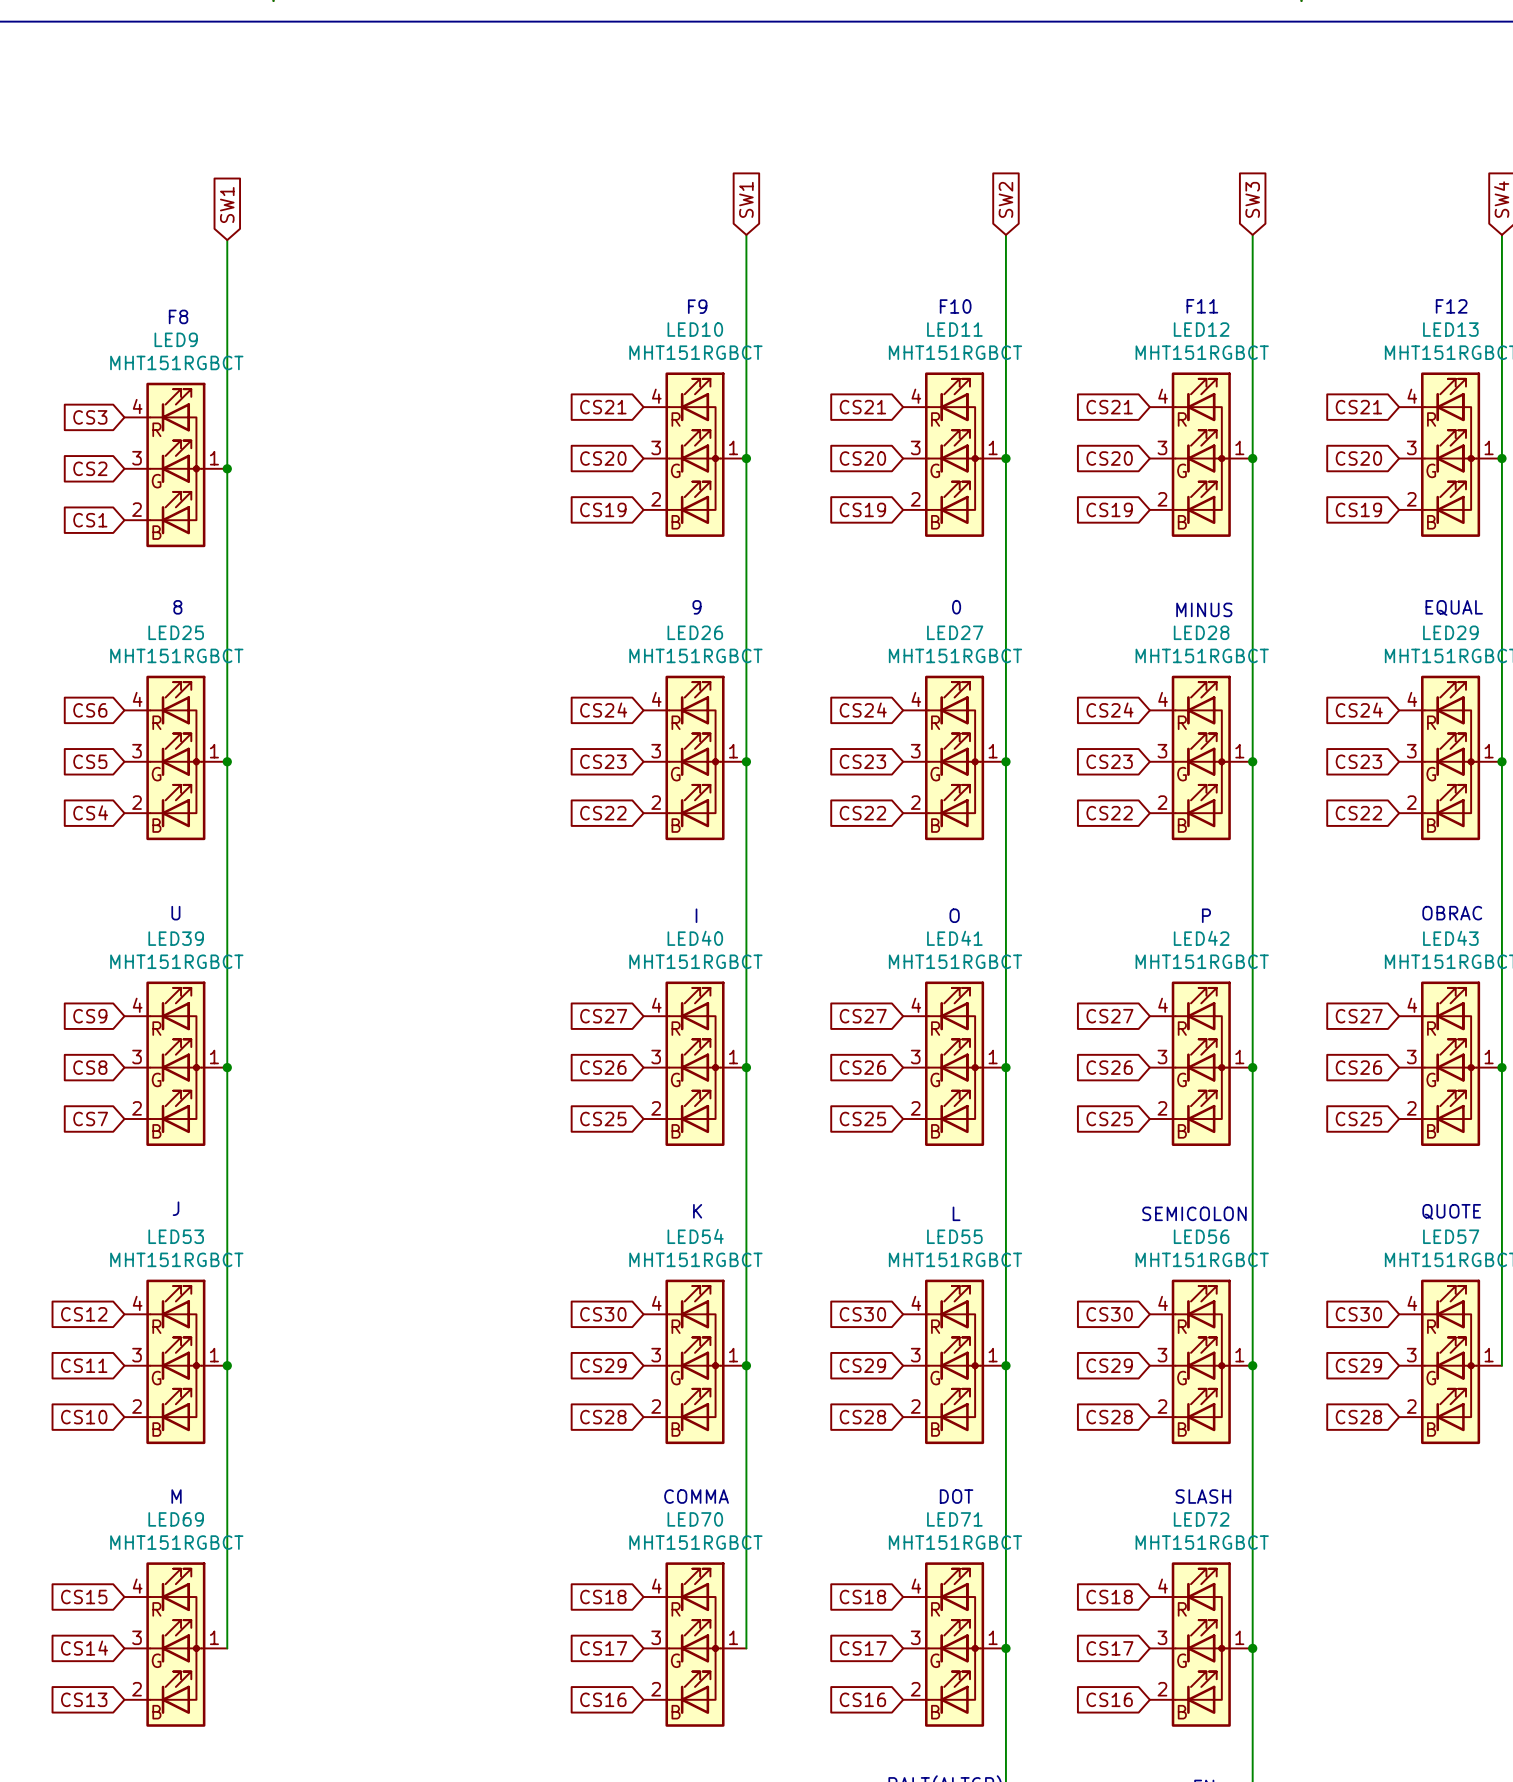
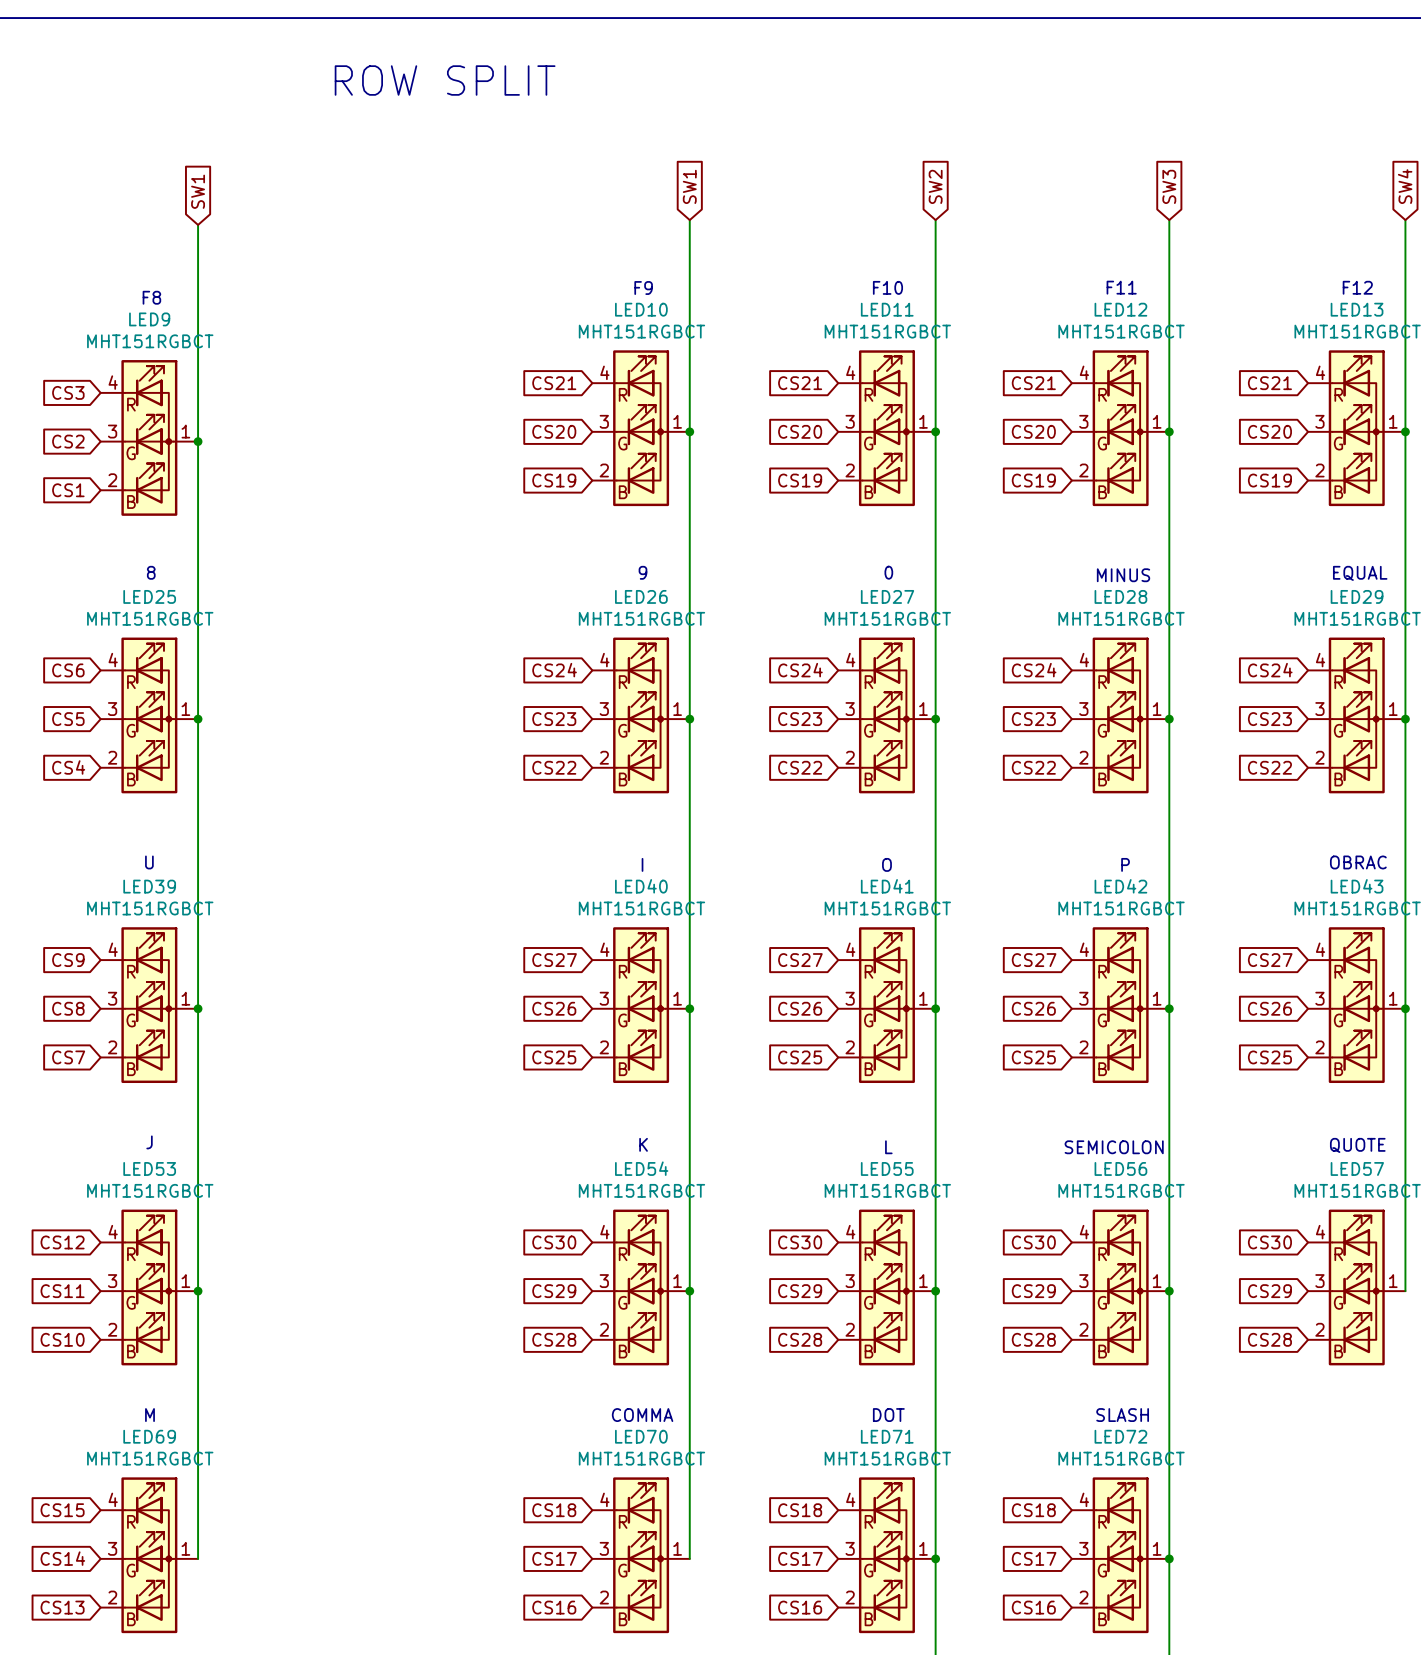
text: none -> ROW SPLIT (445, 80)

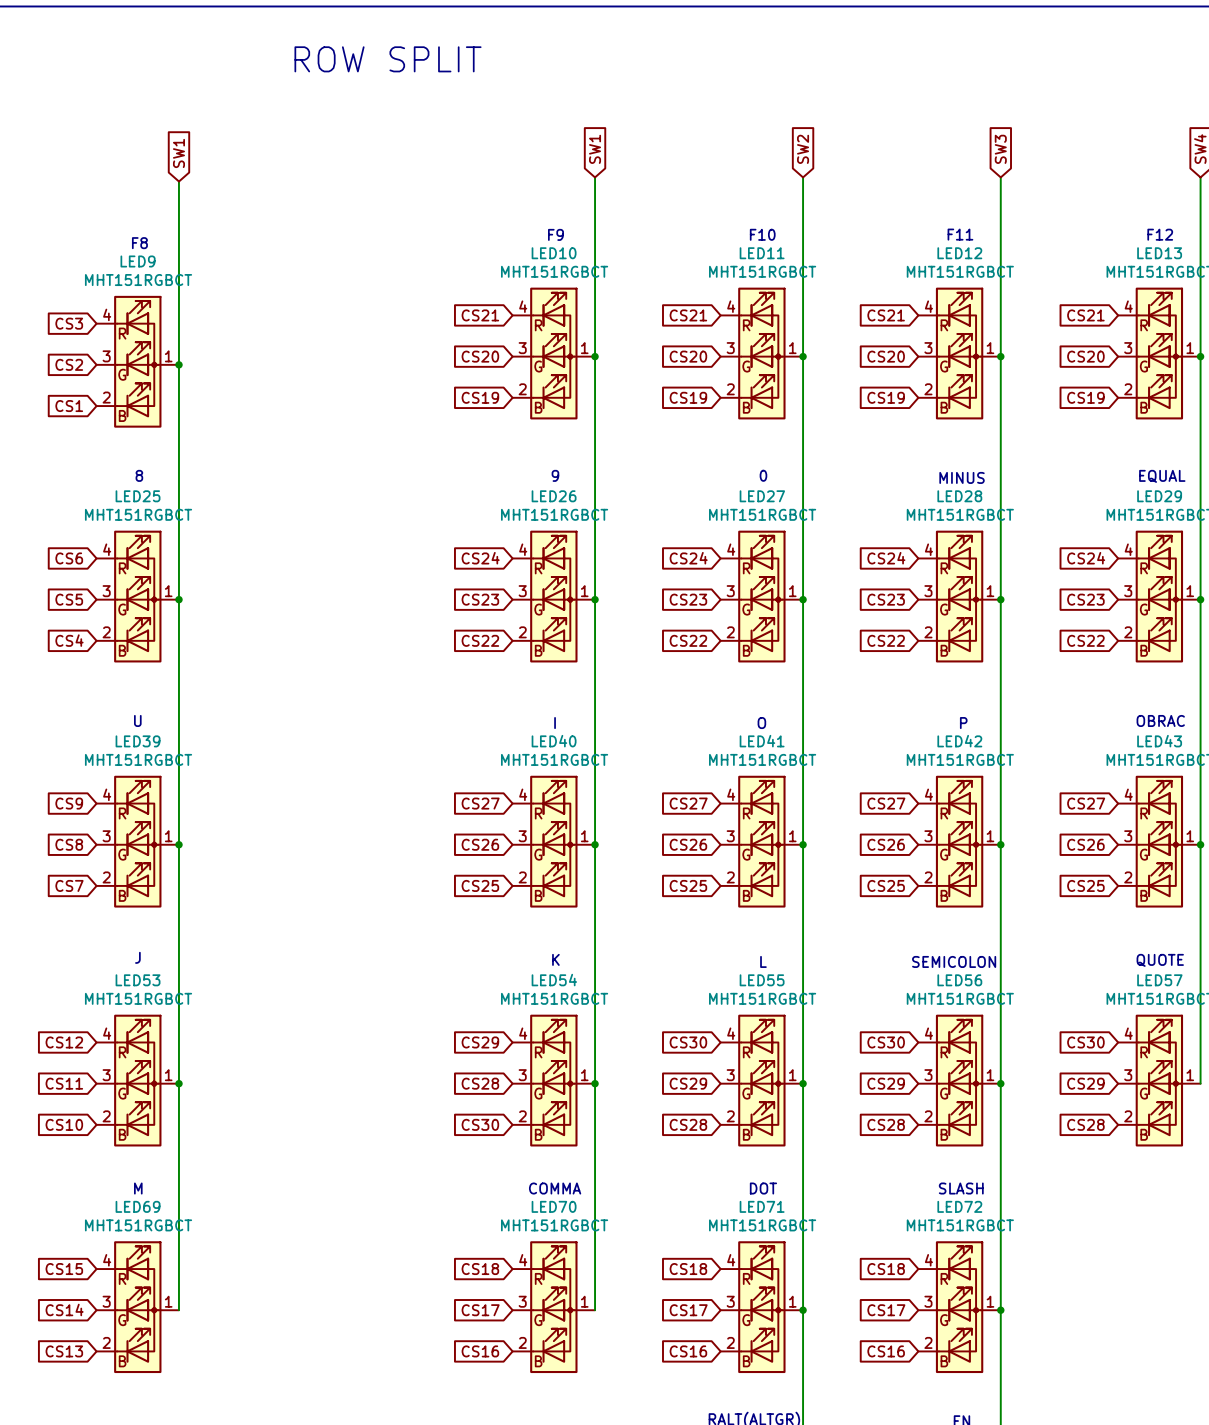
global label: CS30 (554, 1242) -> CS29 (480, 1042)
global label: CS29 (554, 1291) -> CS28 (480, 1083)
global label: CS28 (554, 1339) -> CS30 (480, 1124)

